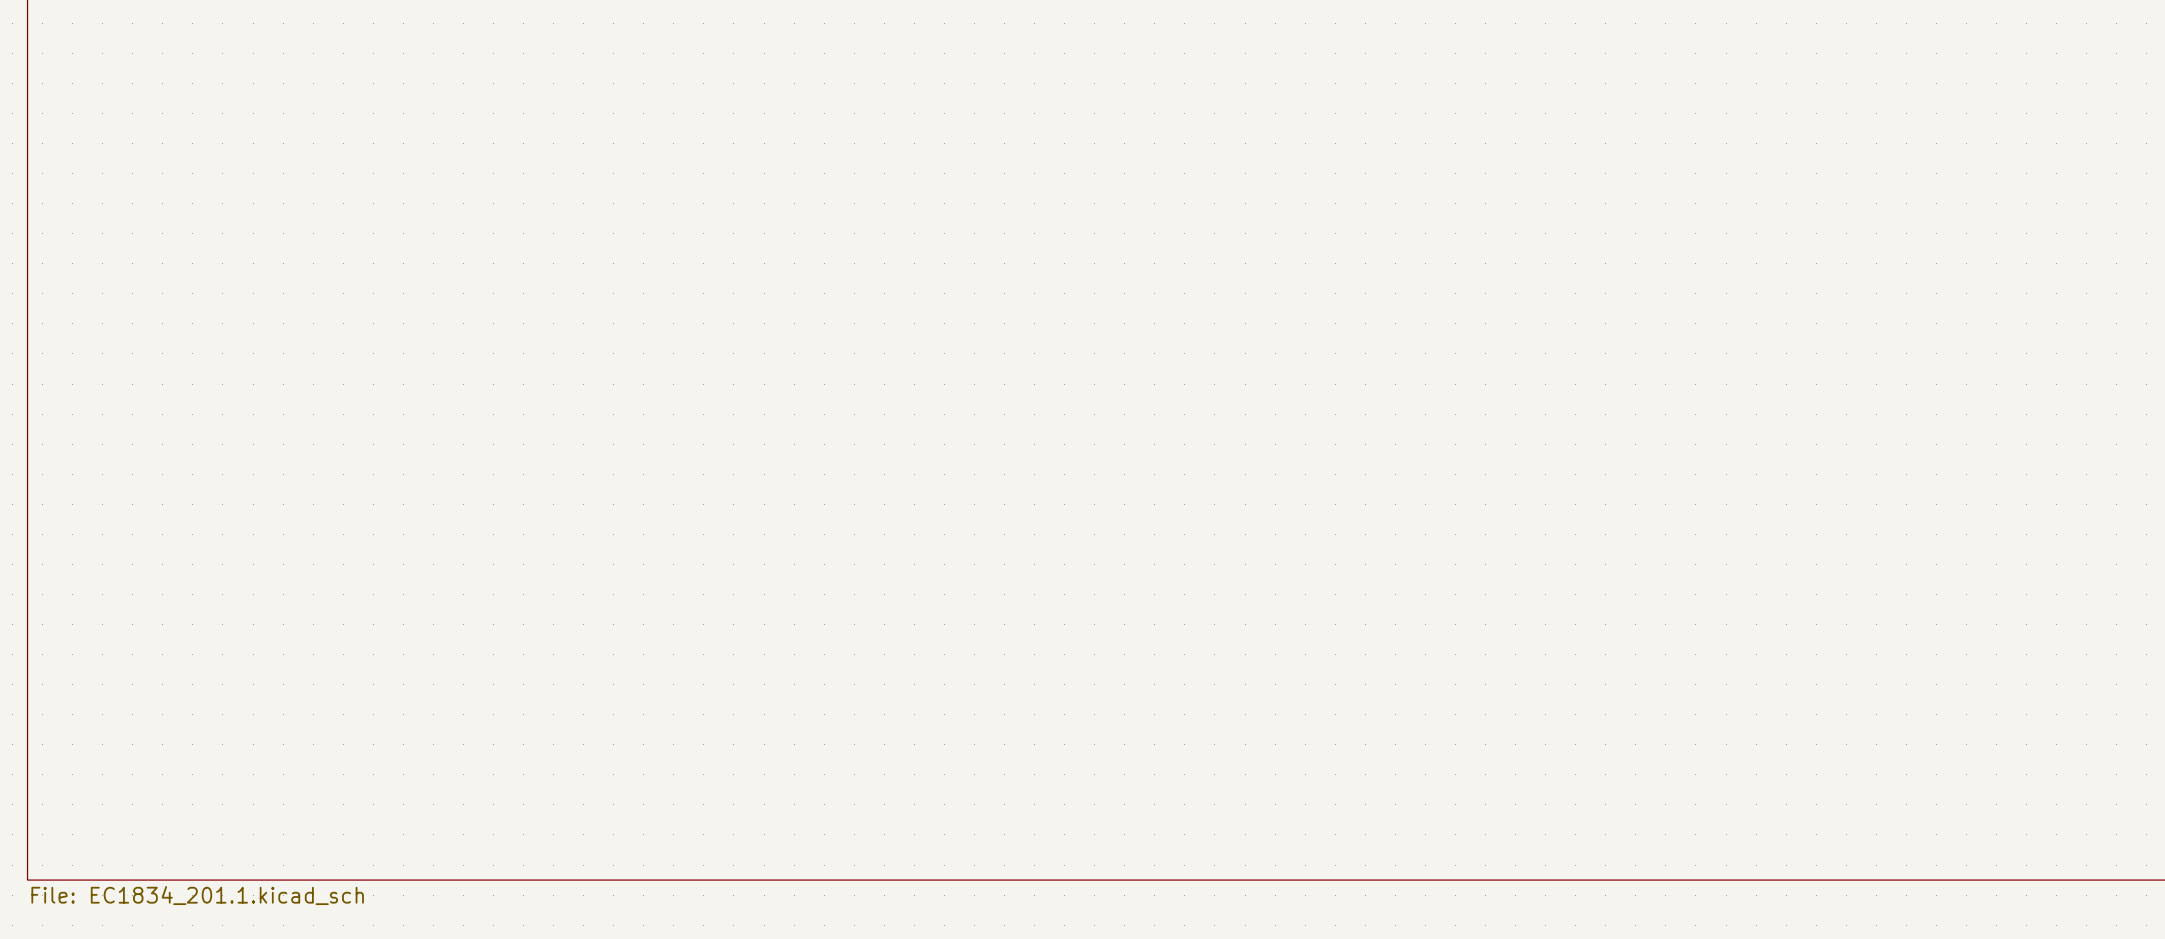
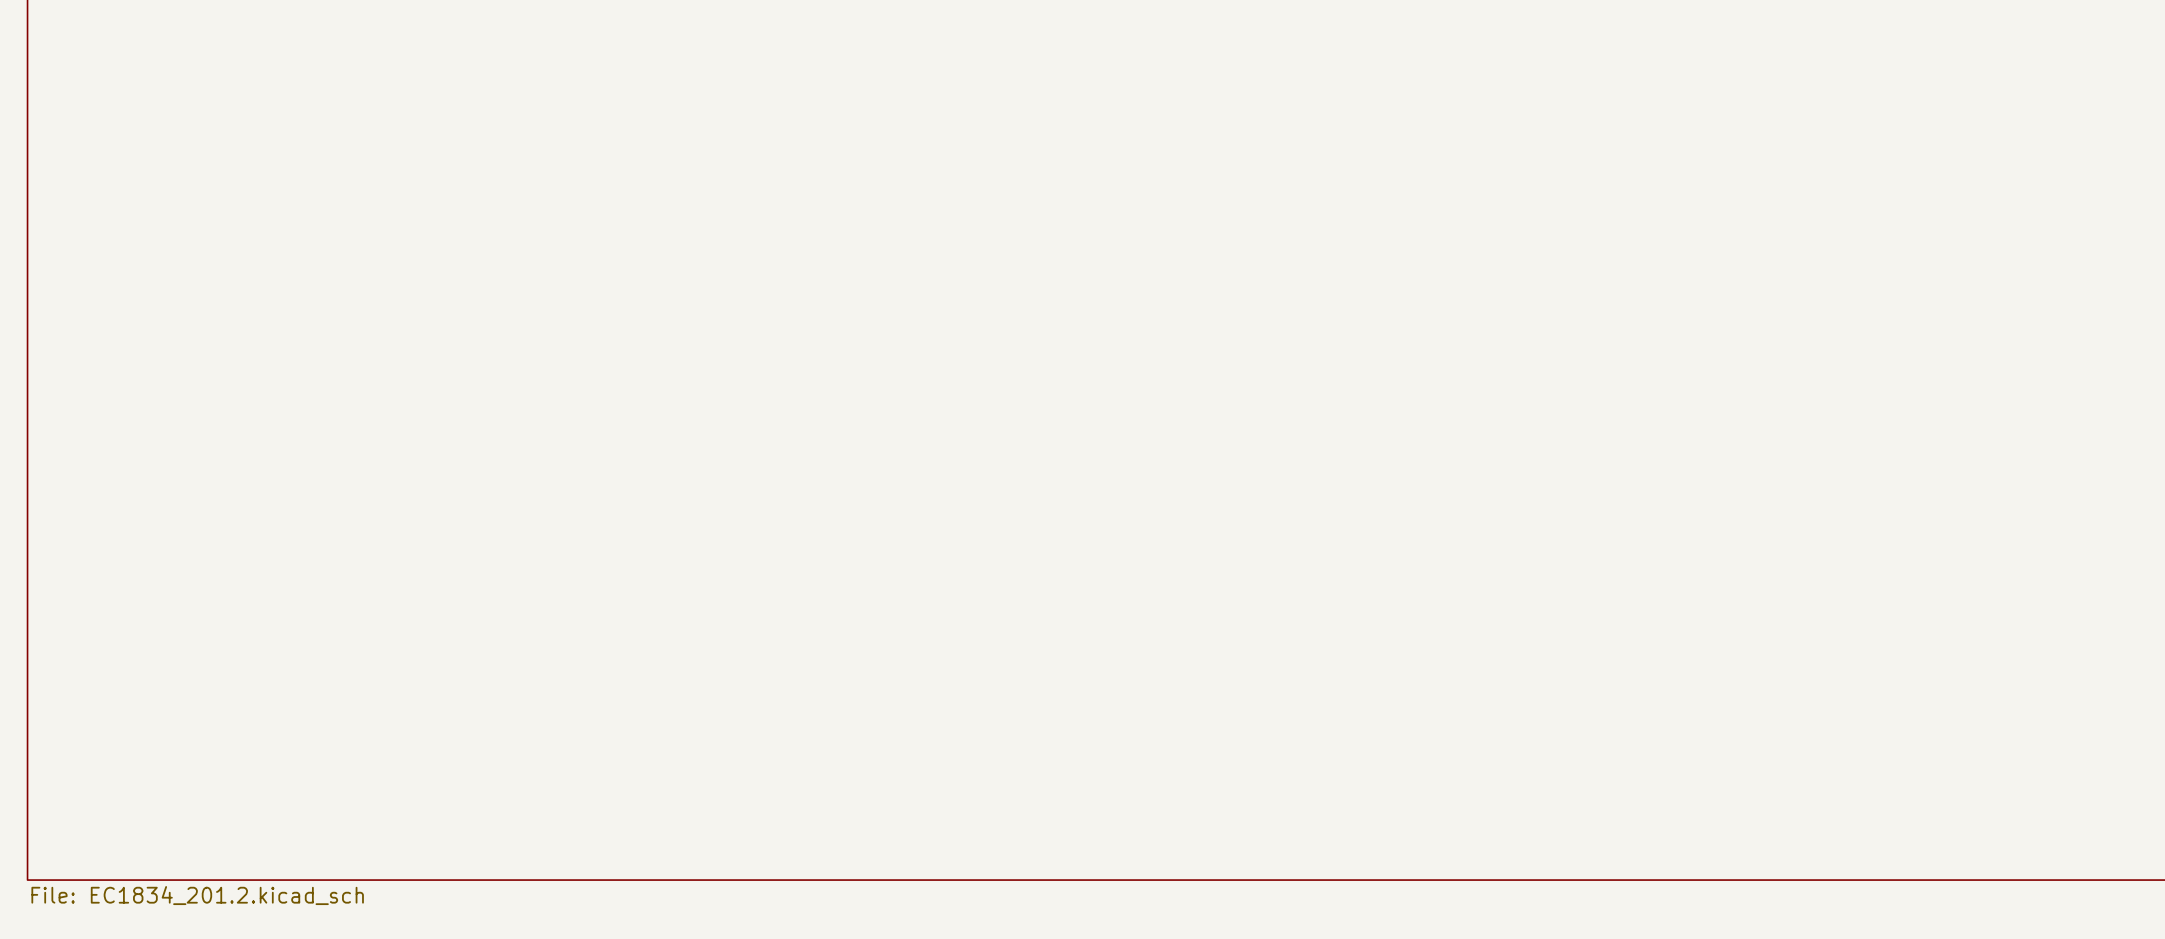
sheet value: File: EC1834_201.1.kicad_sch (197, 895) -> File: EC1834_201.2.kicad_sch (197, 895)

